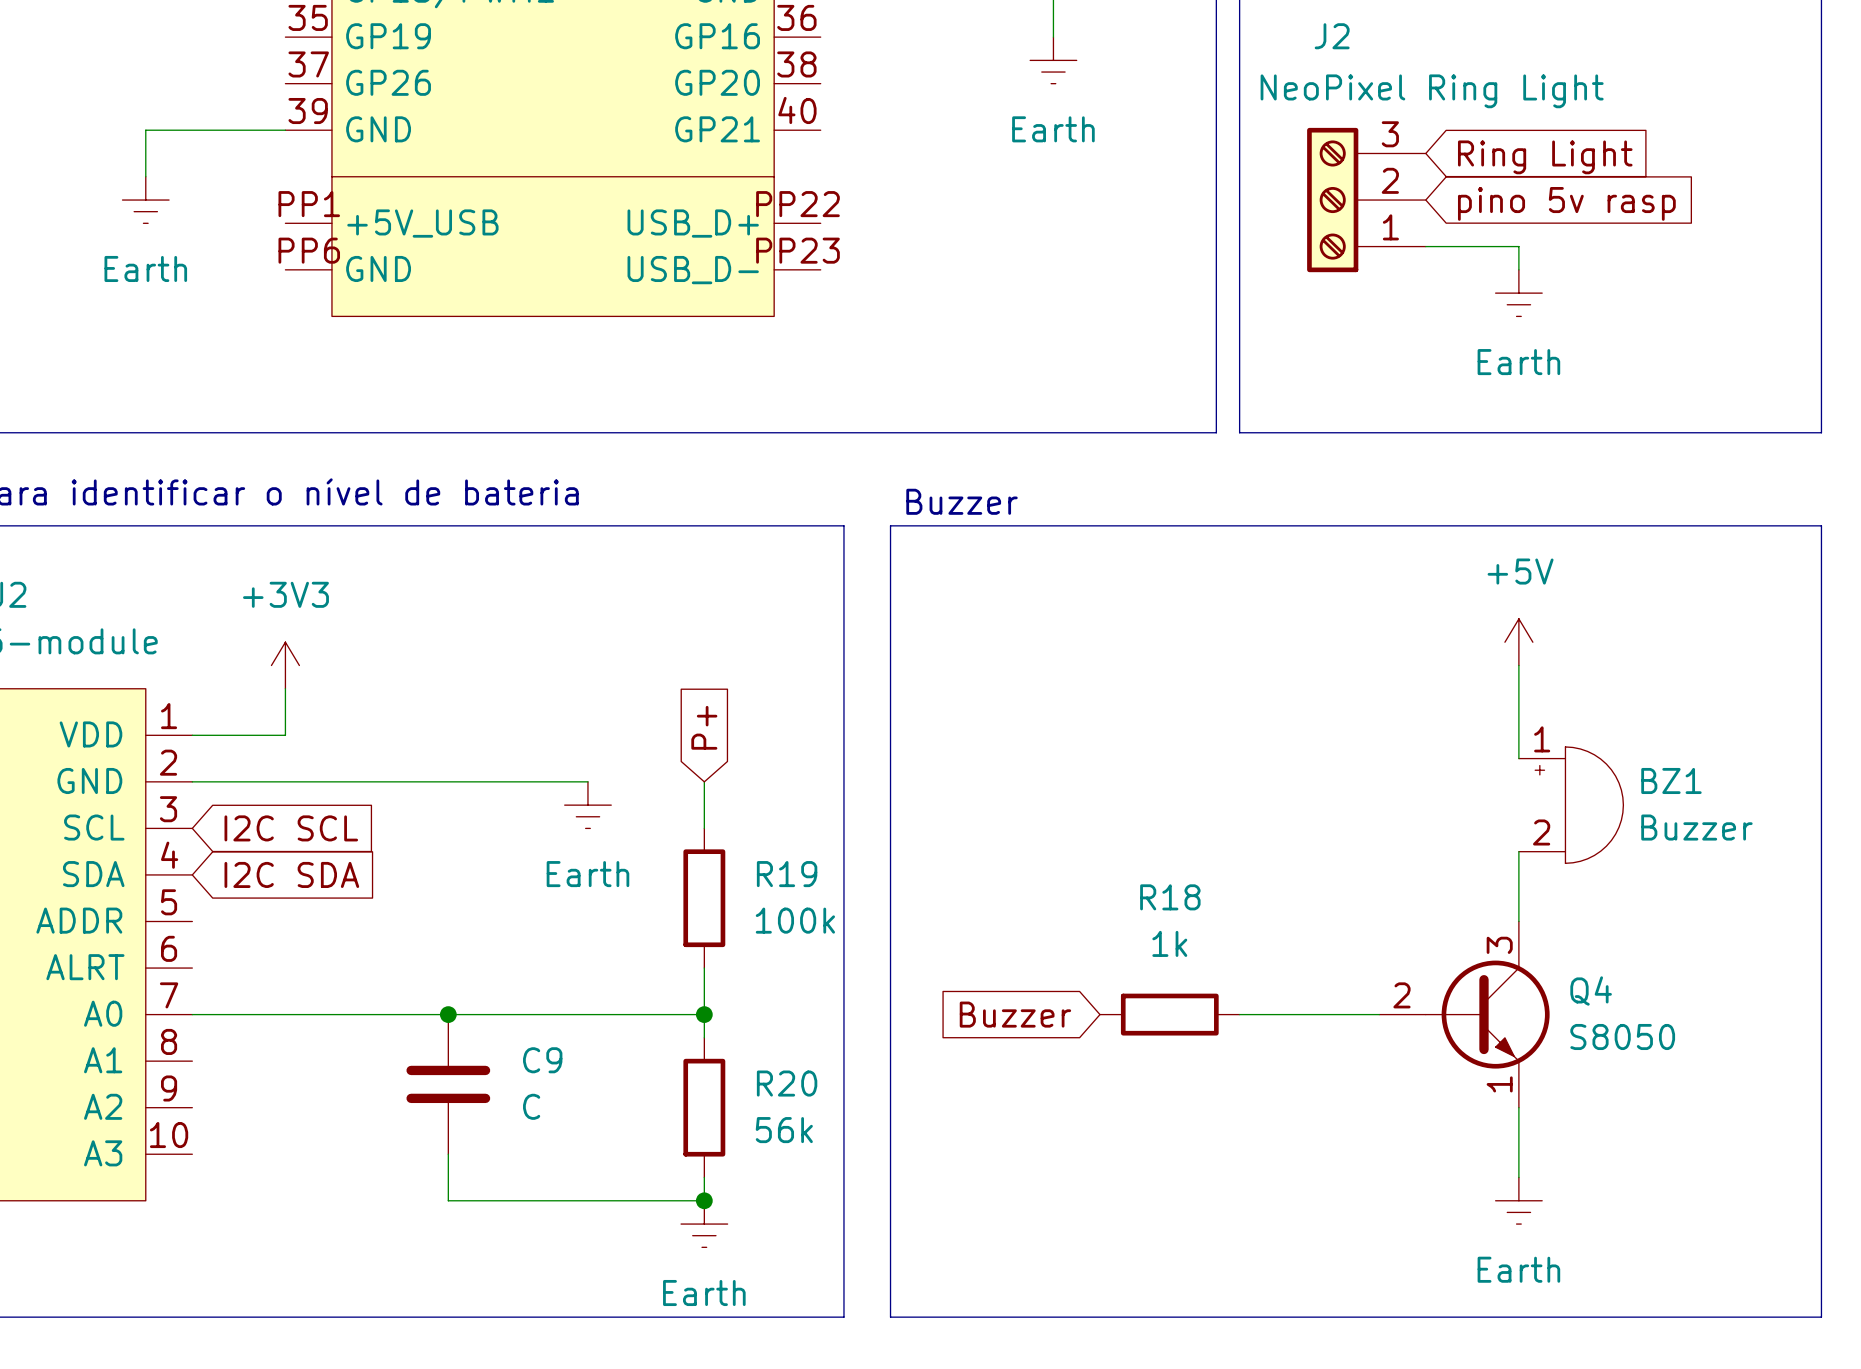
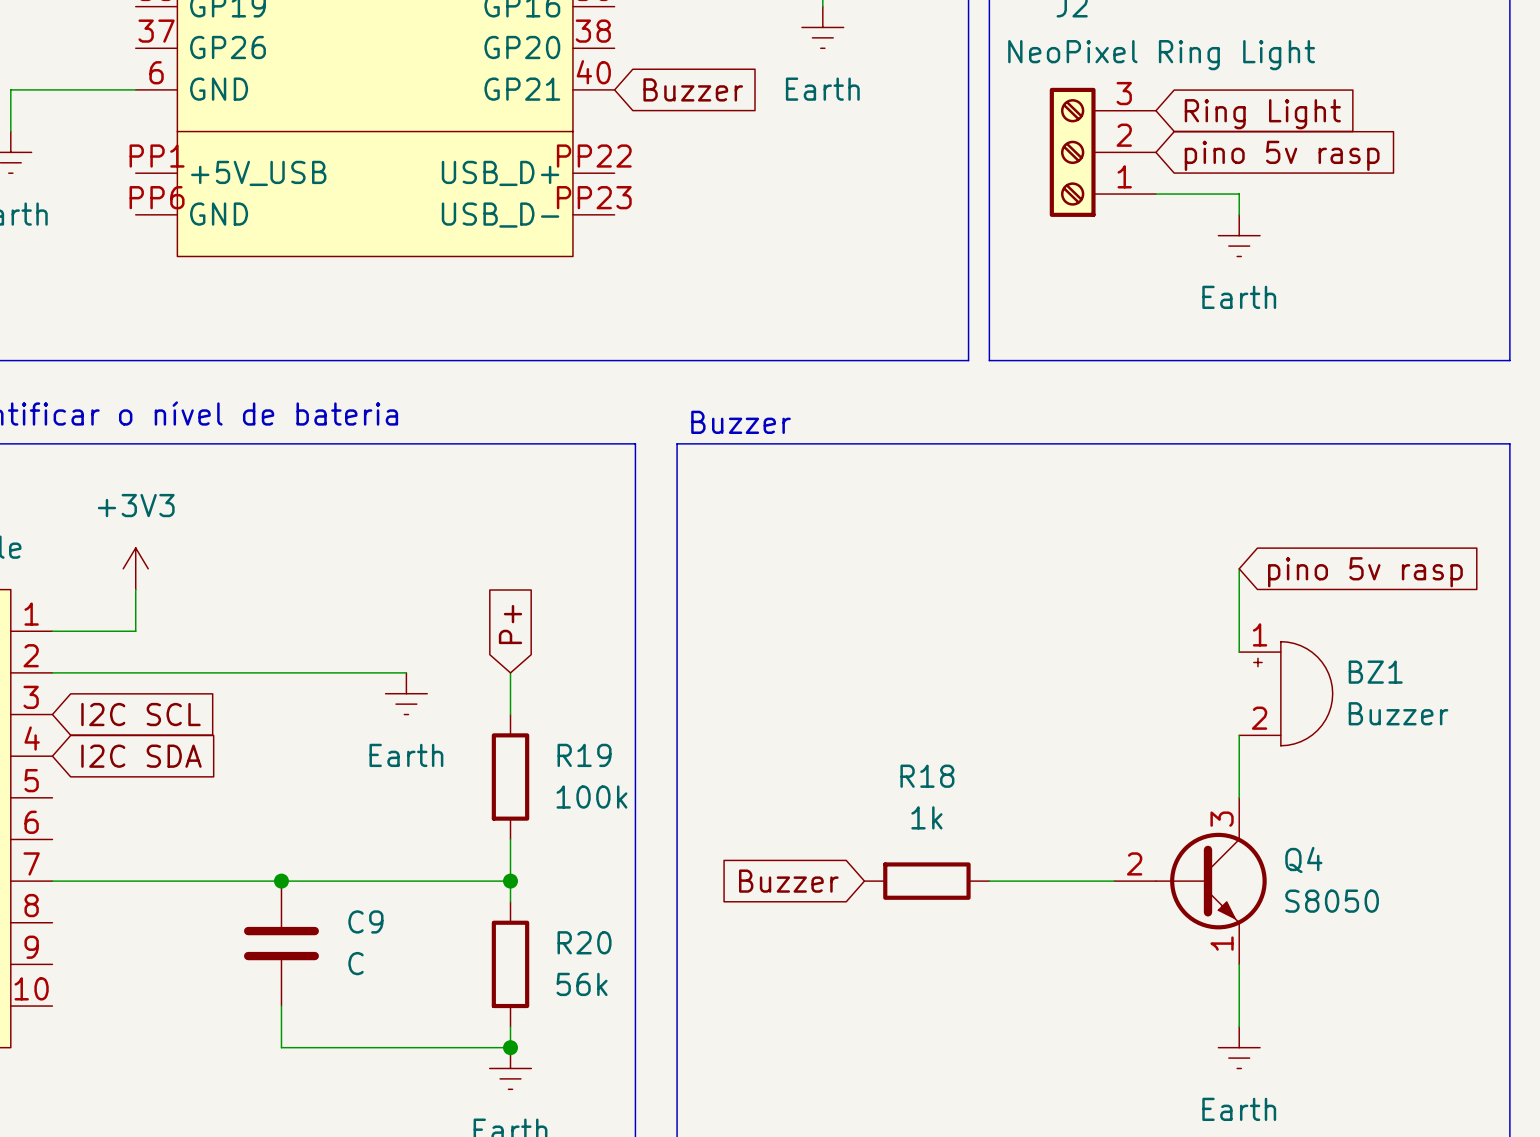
part pin number: 39 (308, 111) -> 6 (156, 72)
global label: none -> Buzzer (693, 89)
power symbol: +5V (1518, 642) -> none
global label: none -> pino 5v rasp (1365, 572)

